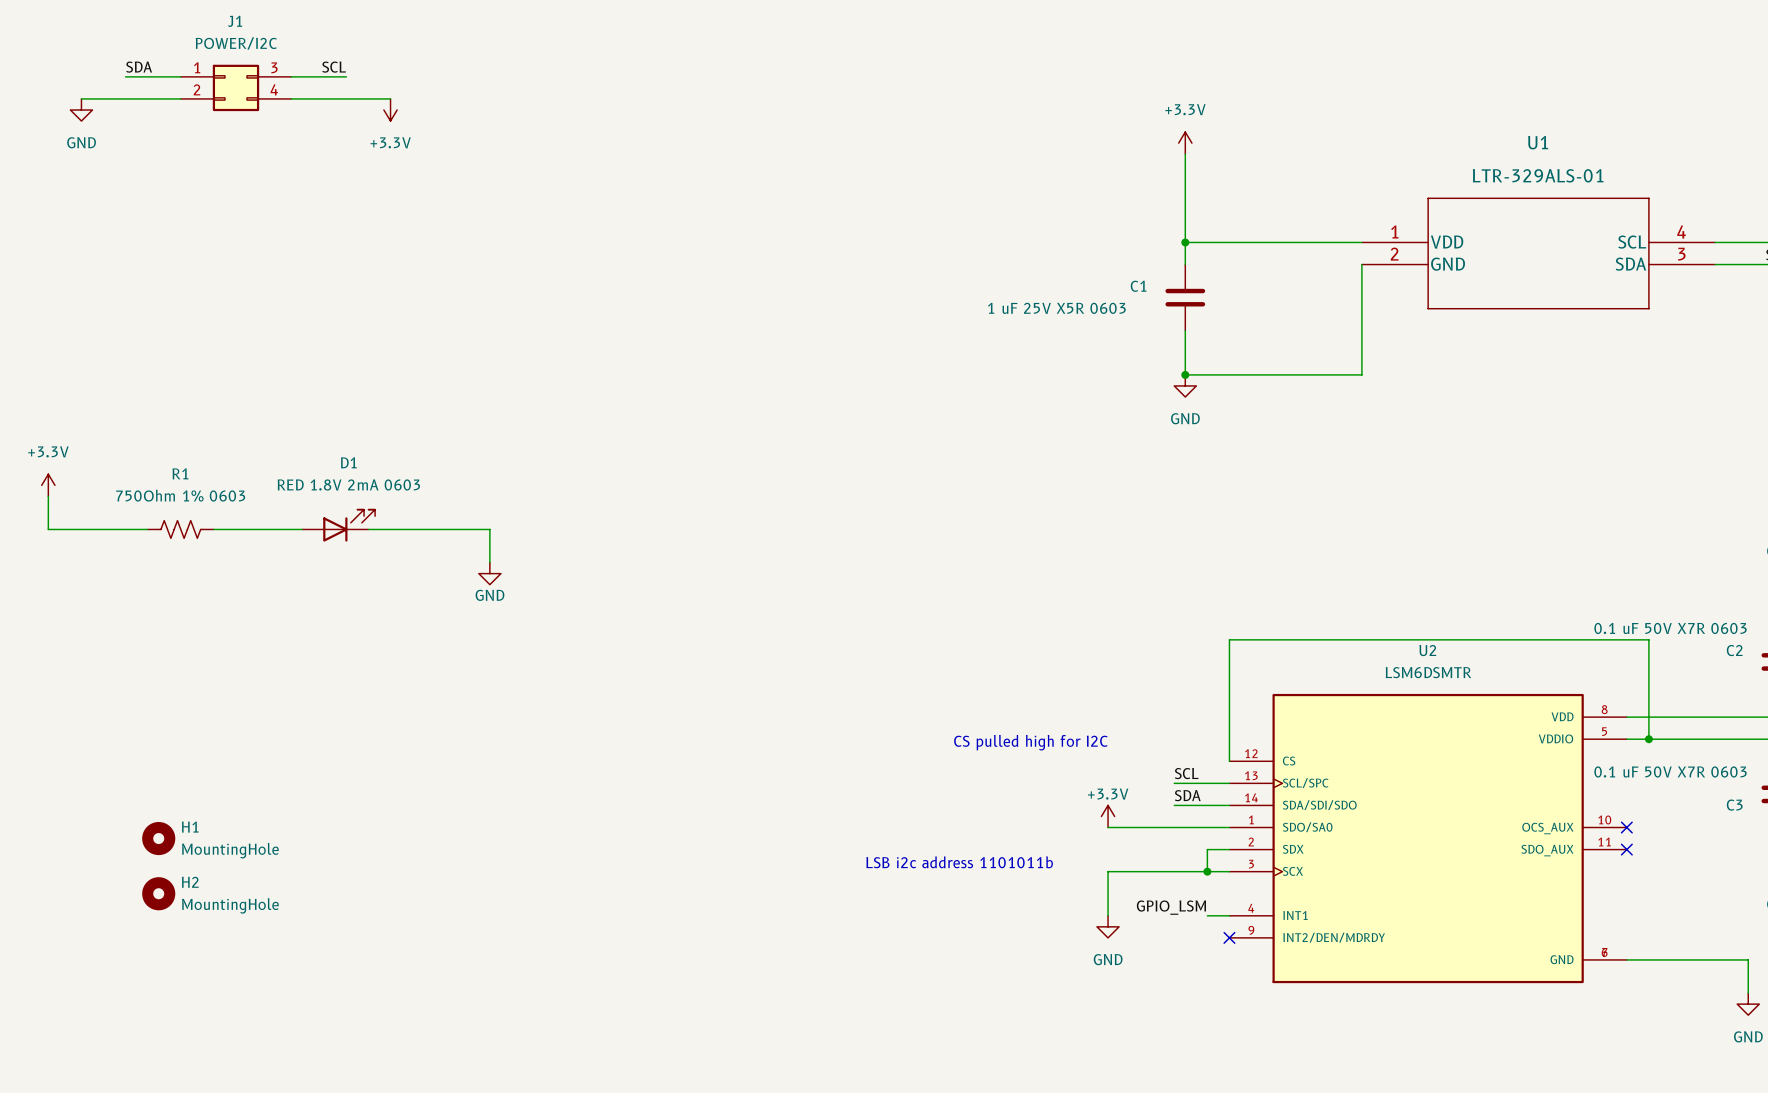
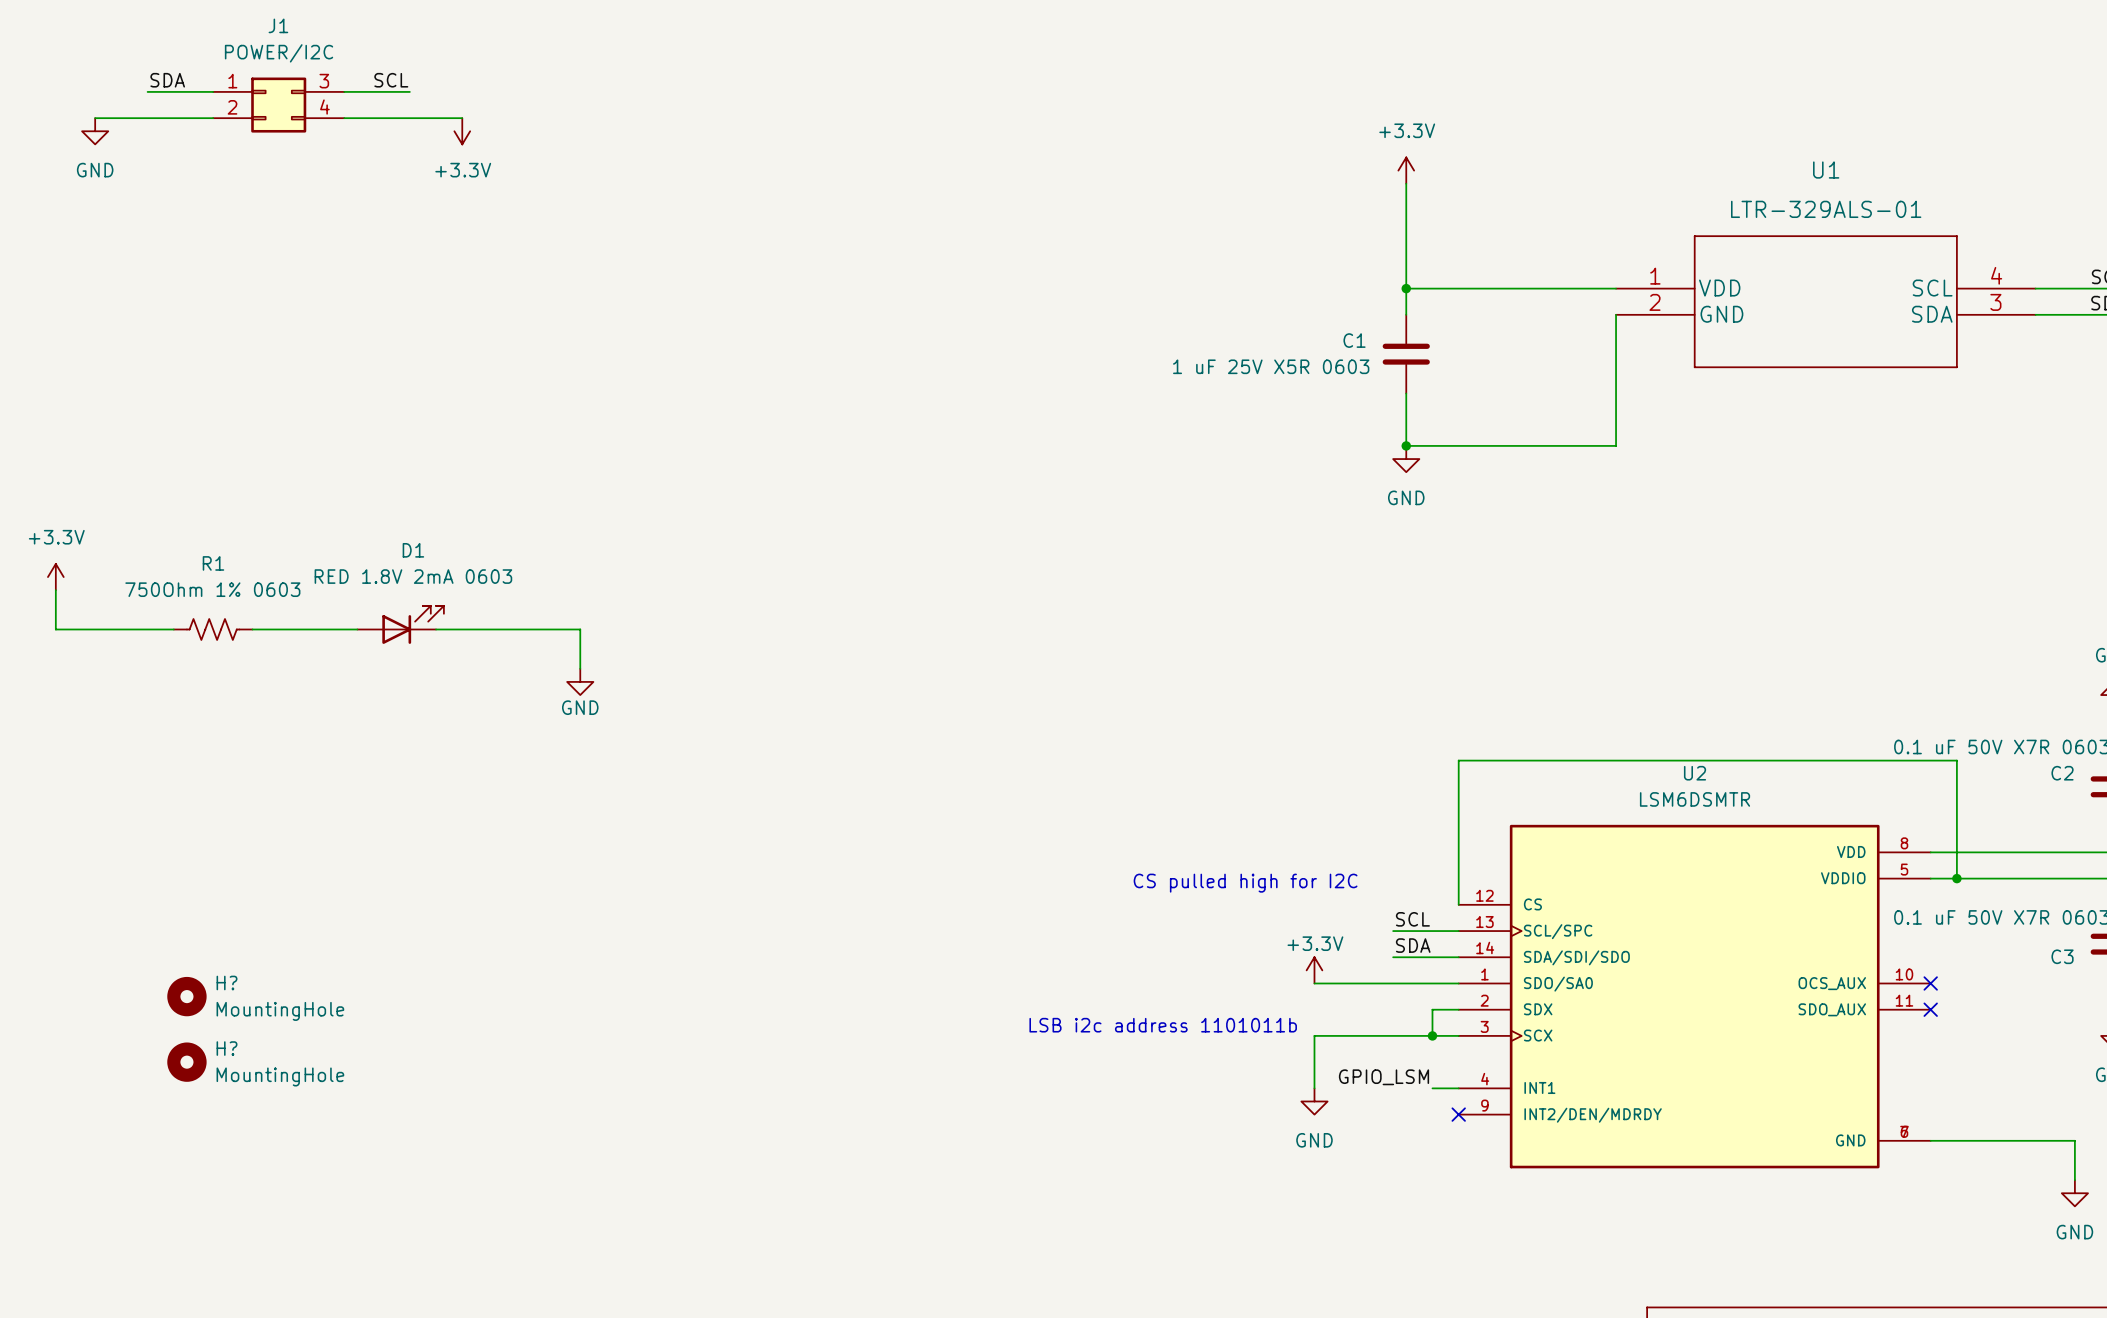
H1 name: H1 (190, 827) -> H? (227, 982)
H2 name: H2 (190, 882) -> H? (227, 1048)

